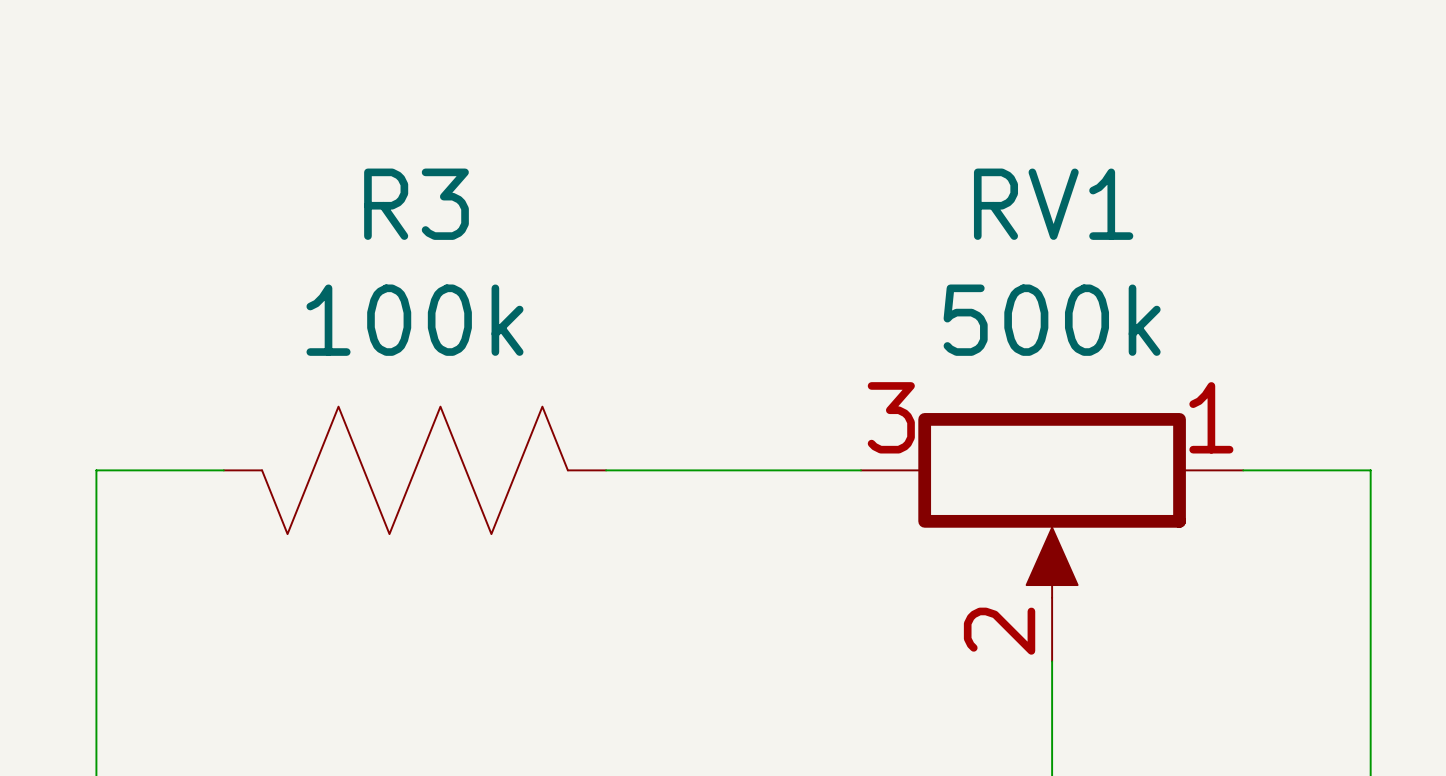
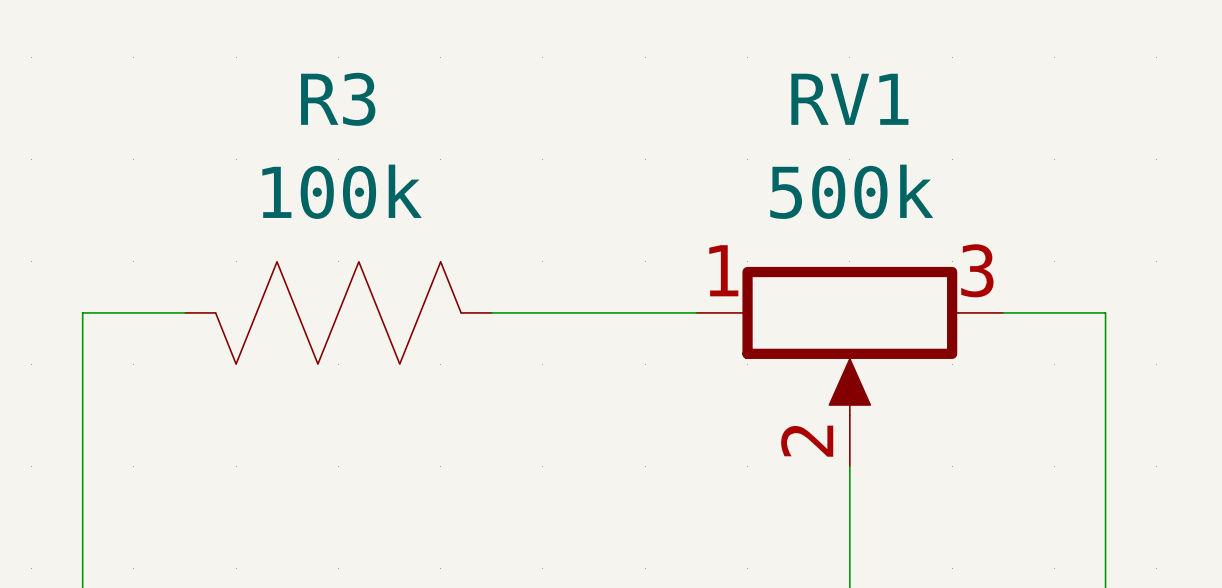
RV1 flip: as is (1052, 505) -> left-right (849, 341)

